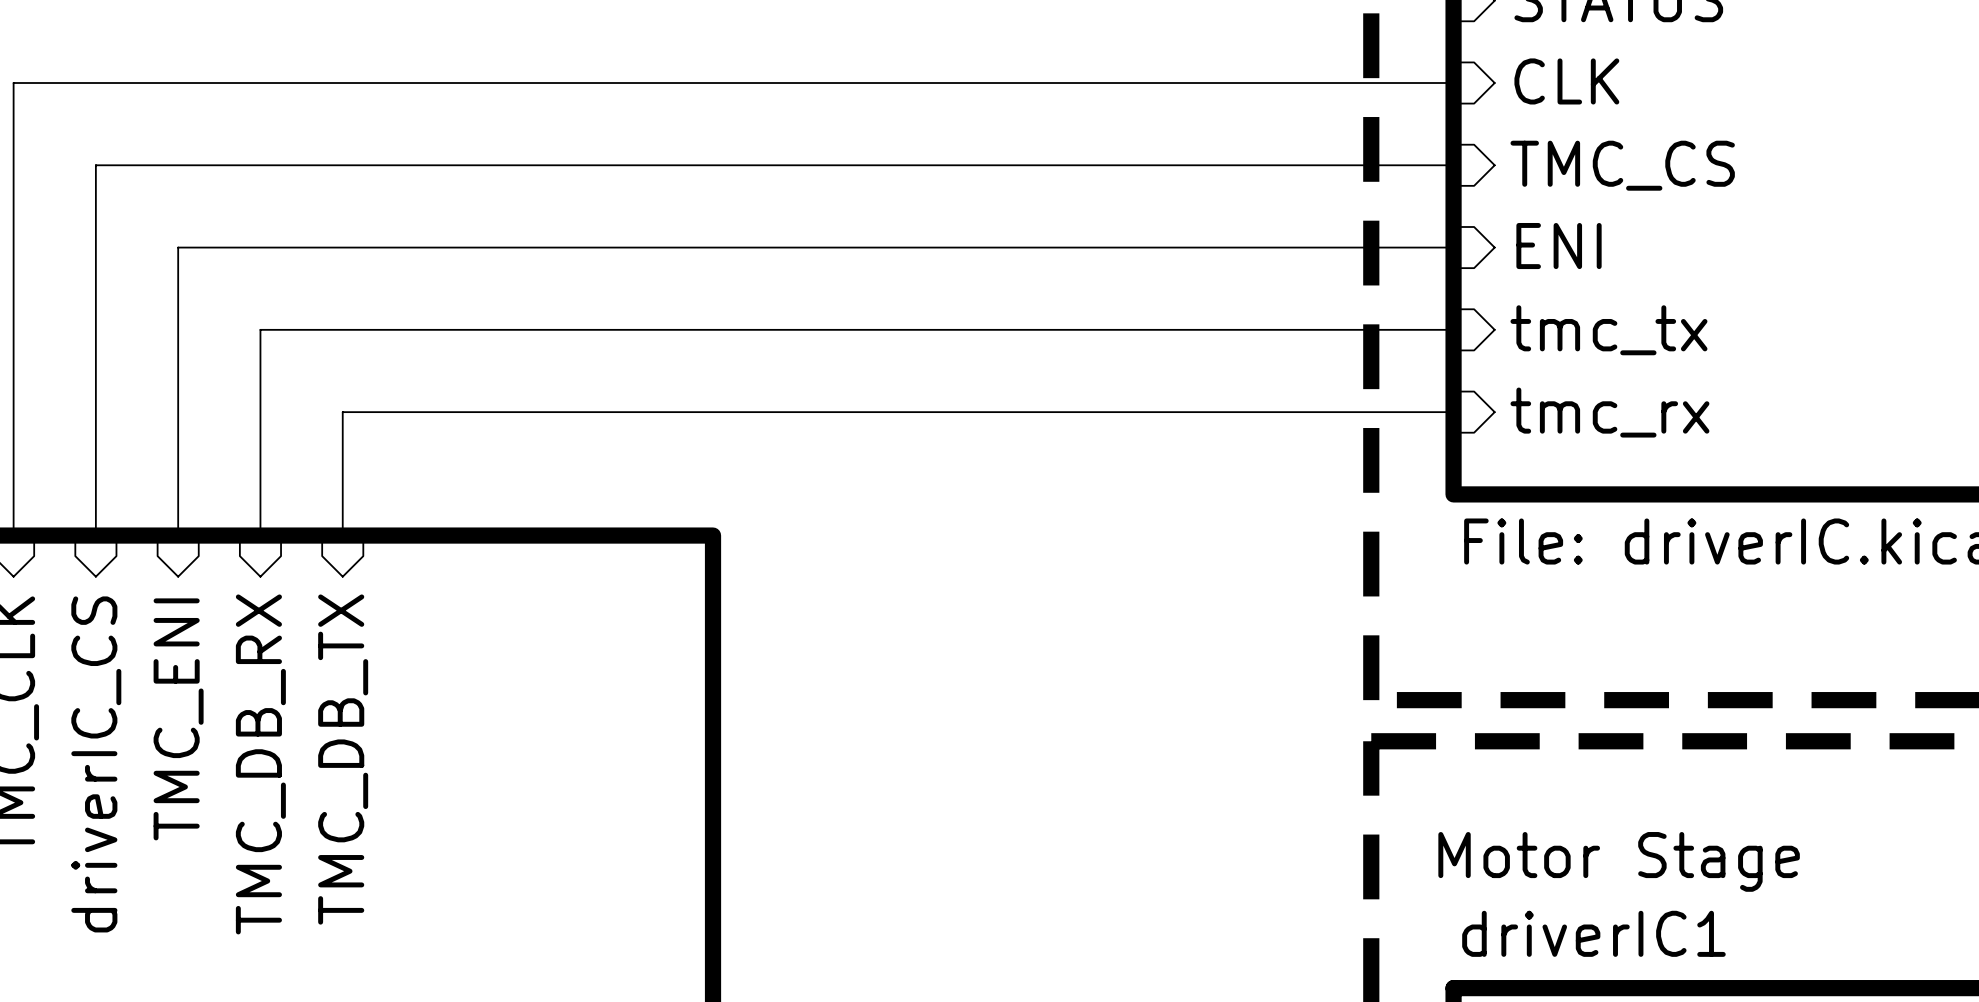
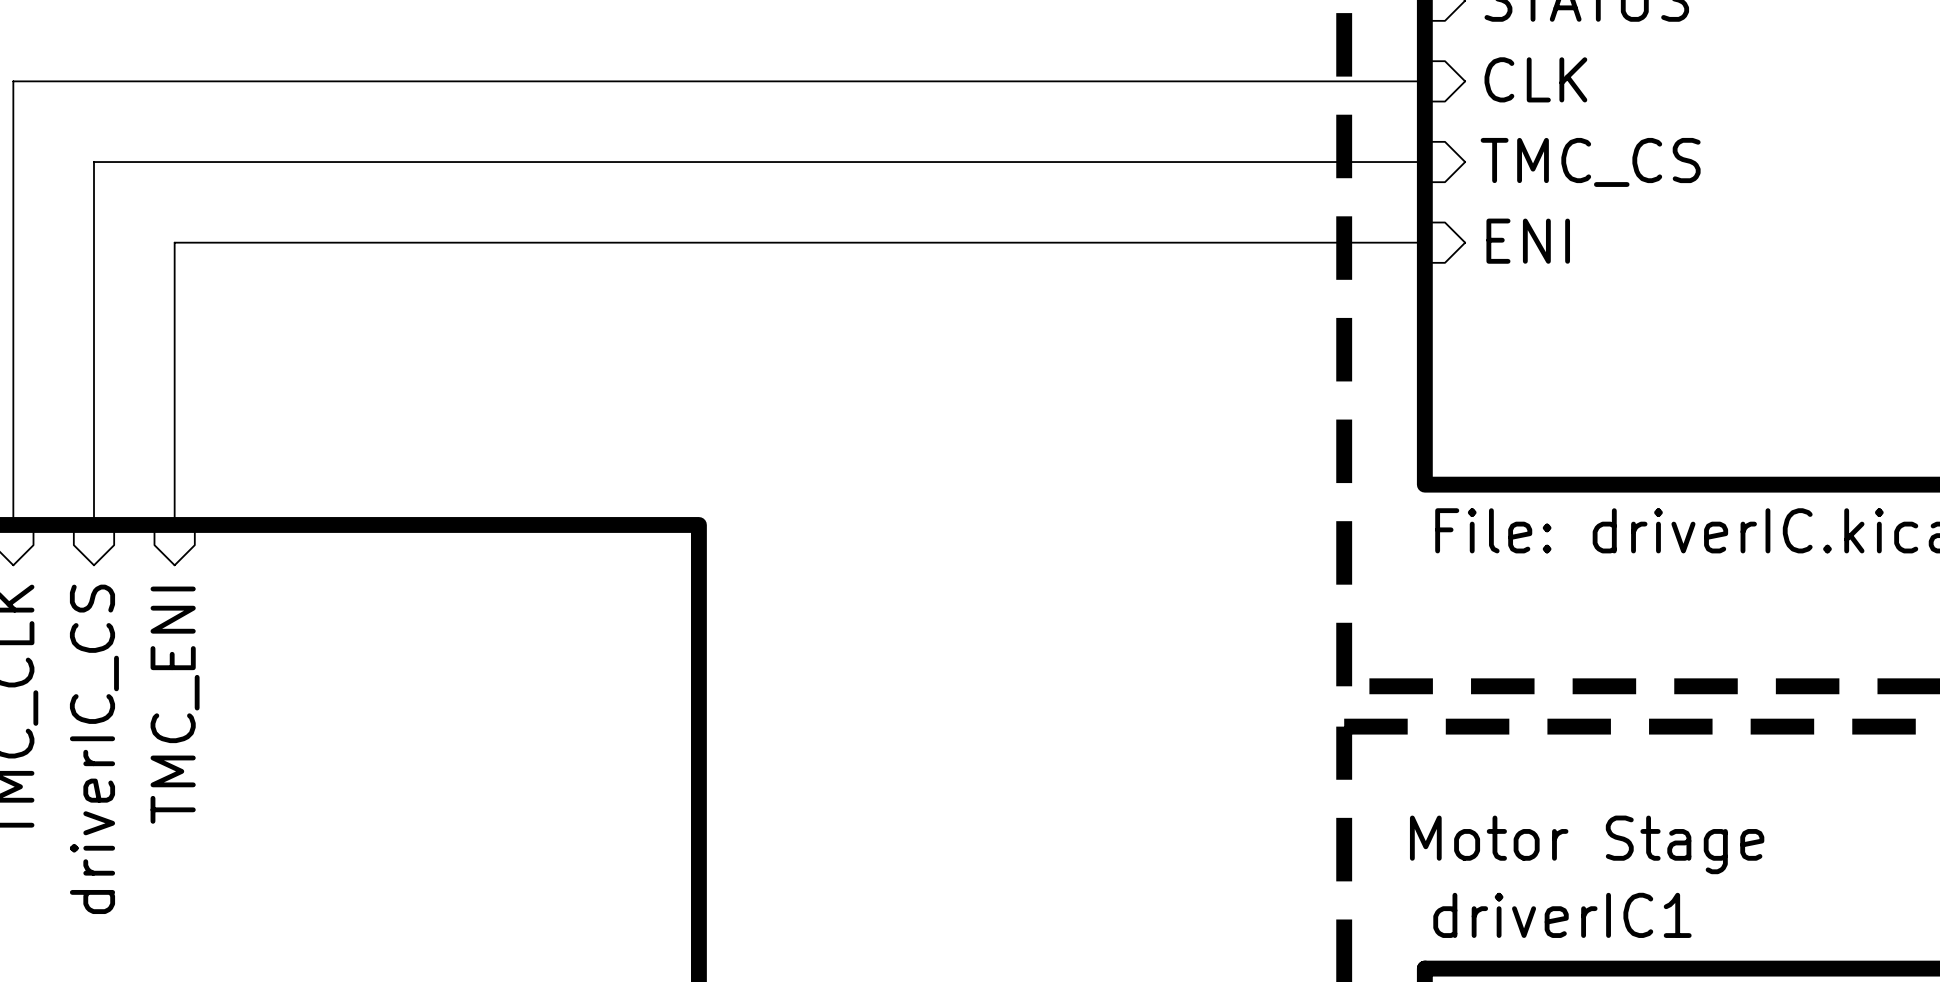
wire: (1453, 329) (260, 329) (260, 535) -> none
sheet pin: tmc_tx (1608, 330) -> none
wire: (1453, 412) (342, 412) (342, 535) -> none
sheet pin: tmc_rx (1609, 412) -> none
sheet pin: TMC_DB_TX (343, 759) -> none
sheet pin: TMC_DB_RX (260, 764) -> none

